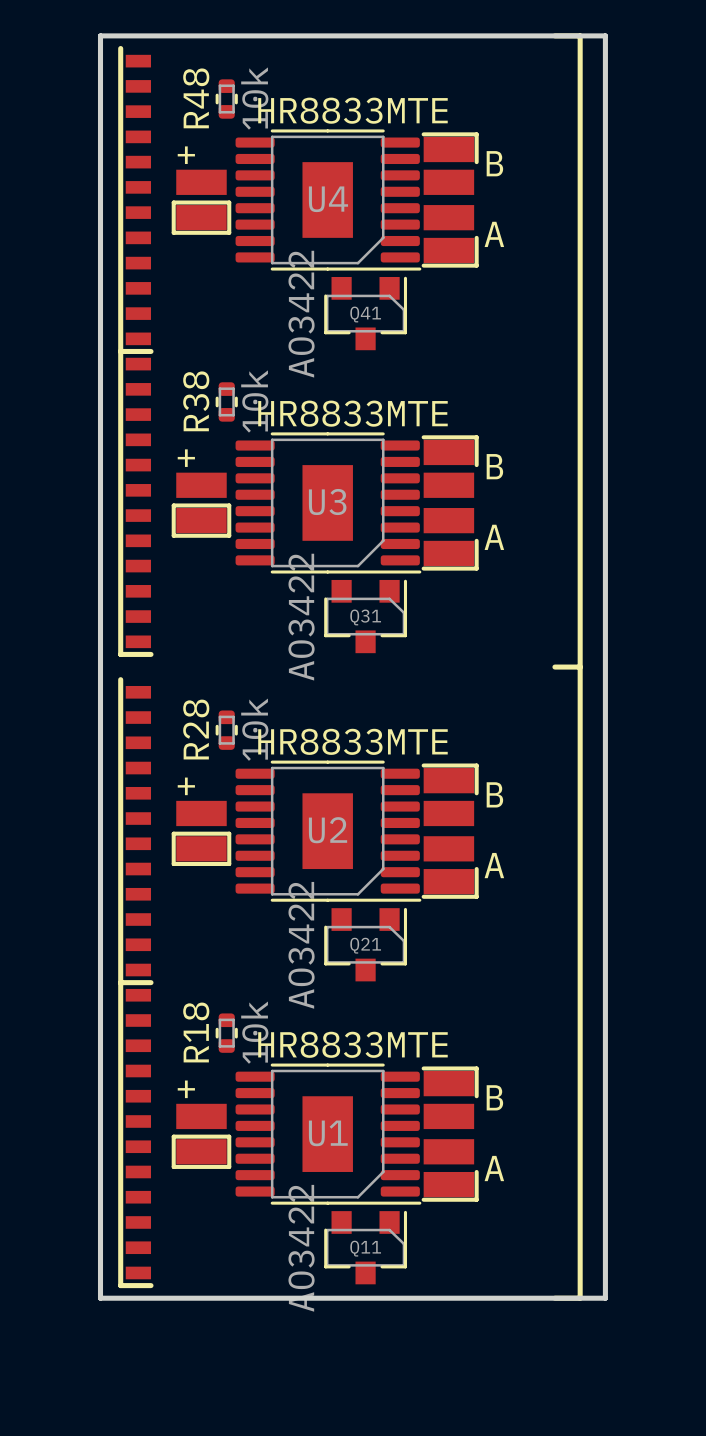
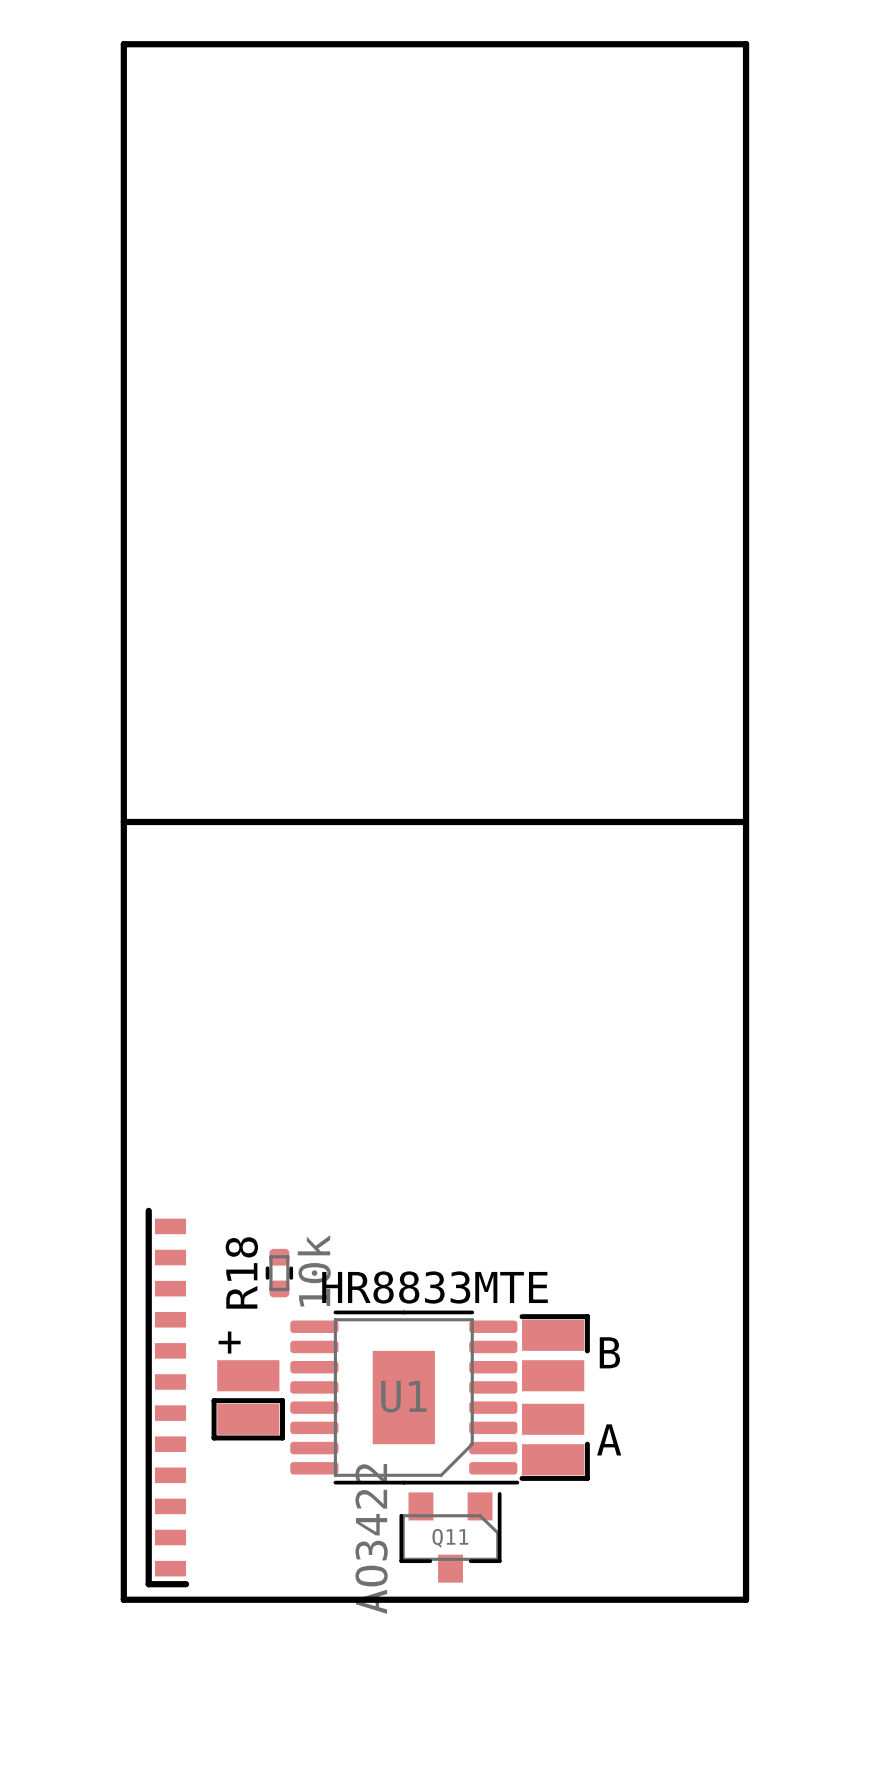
line: (554, 35) (580, 35) (580, 1298) (554, 1298) -> none
R48: 10k (226, 99) -> none
line: (423, 134) (476, 134) (476, 162) -> none
part: (448, 149) -> none
text: + (186, 155) -> none
text: B (494, 163) -> none
part: (201, 182) -> none
part: (448, 182) -> none
part: (135, 200) -> none
U4: HR8833MTE (328, 200) -> none
line: (173, 202) (173, 232) (229, 232) (229, 202) (173, 202) -> none
part: (201, 217) -> none
part: (448, 217) -> none
text: A (494, 234) -> none
line: (476, 237) (476, 265) (423, 265) -> none
part: (448, 250) -> none
Q41: AO3422 (365, 313) -> none
R38: 10k (226, 401) -> none
line: (423, 437) (476, 437) (476, 465) -> none
part: (448, 452) -> none
text: + (186, 458) -> none
text: B (494, 466) -> none
part: (201, 485) -> none
part: (448, 485) -> none
part: (135, 502) -> none
U3: HR8833MTE (328, 502) -> none
line: (173, 505) (173, 535) (229, 535) (229, 505) (173, 505) -> none
part: (201, 520) -> none
part: (448, 520) -> none
text: A (494, 537) -> none
line: (476, 540) (476, 568) (423, 568) -> none
part: (448, 553) -> none
Q31: AO3422 (365, 616) -> none
line: none -> (123, 821) (683, 821)
line: none -> (714, 821) (746, 821)
R28: 10k (226, 730) -> none
line: (423, 765) (476, 765) (476, 793) -> none
part: (448, 780) -> none
text: + (186, 786) -> none
text: B (494, 794) -> none
part: (201, 813) -> none
part: (448, 813) -> none
part: (135, 831) -> none
U2: HR8833MTE (328, 831) -> none
line: (173, 833) (173, 863) (229, 863) (229, 833) (173, 833) -> none
part: (201, 848) -> none
part: (448, 848) -> none
text: A (494, 865) -> none
line: (476, 869) (476, 896) (423, 896) -> none
part: (448, 881) -> none
Q21: AO3422 (365, 944) -> none

